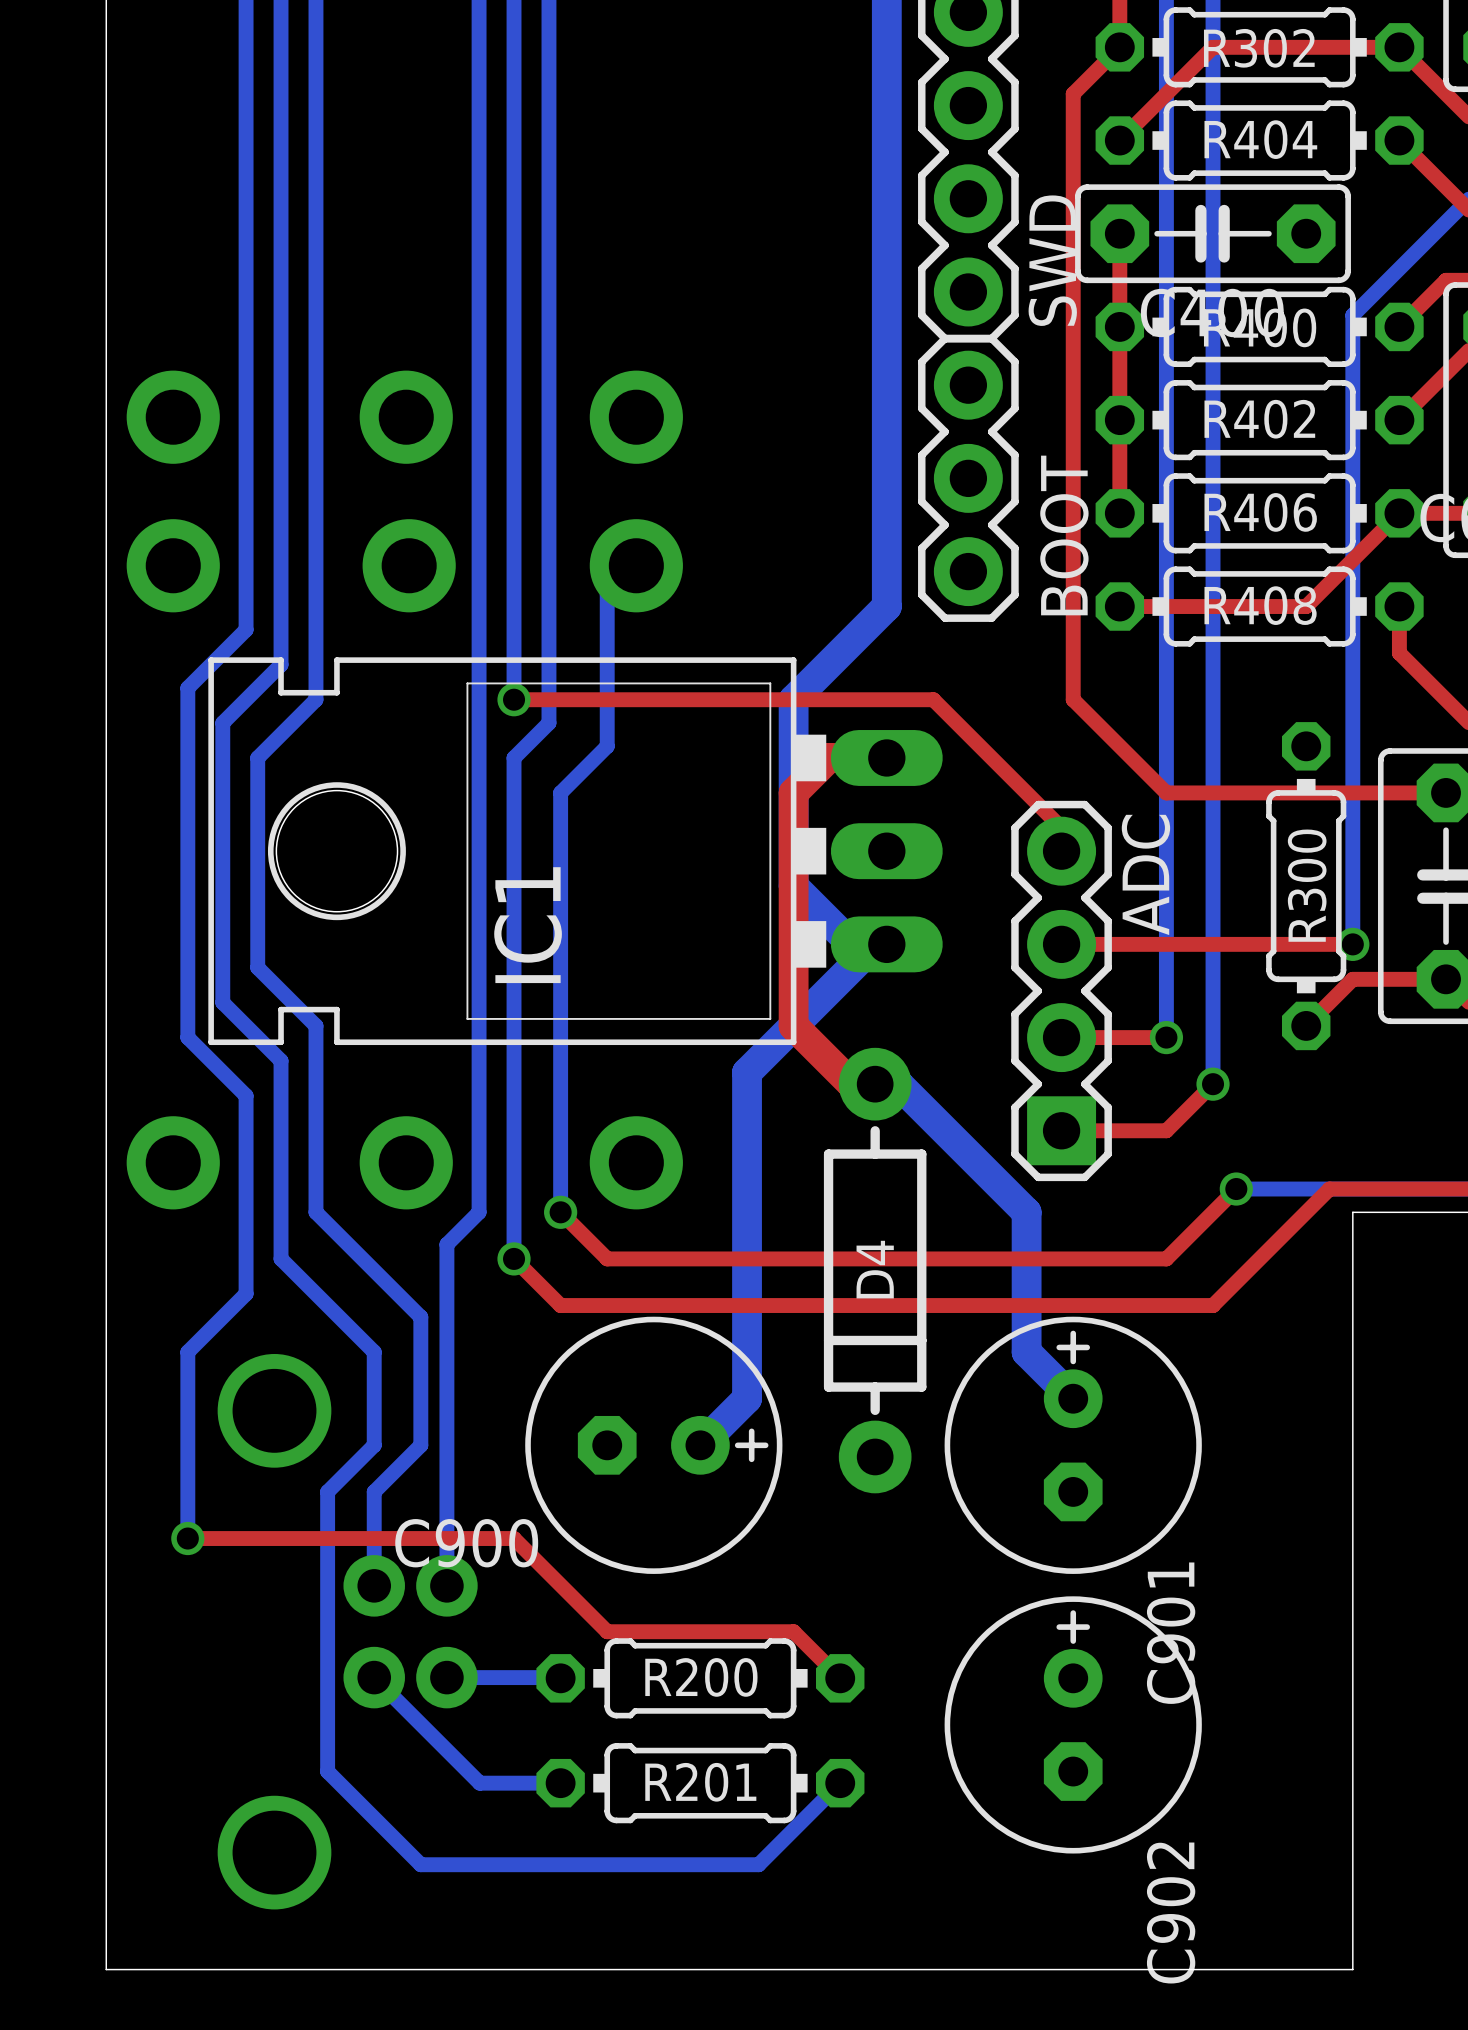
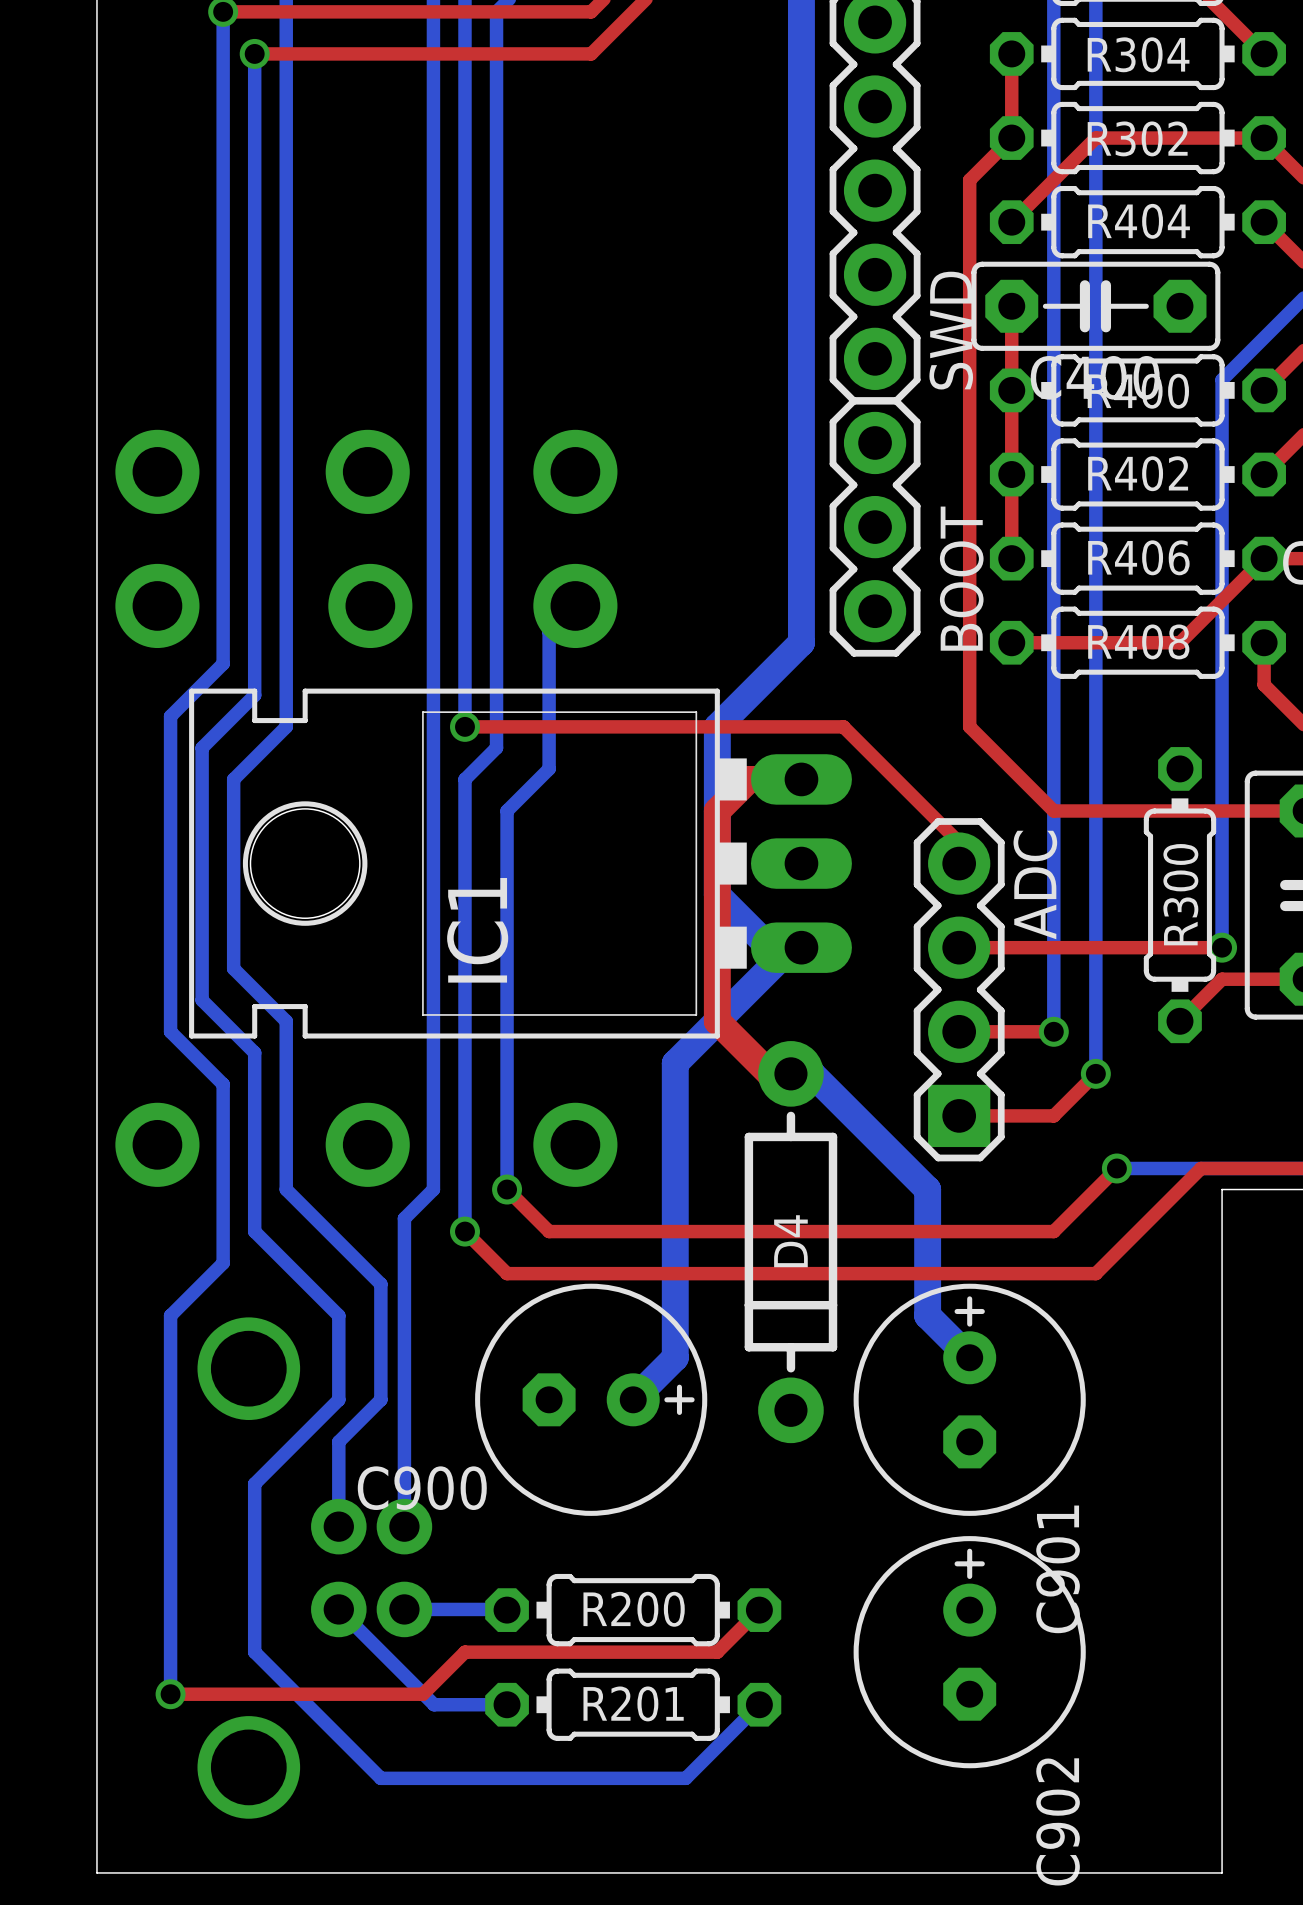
bottom track: (327, 1491) (327, 1771) -> (296, 1441) (254, 1483) (254, 1652) (296, 1694)
top track: (187, 1538) (514, 1538) (607, 1631) (793, 1631) (840, 1678) -> (170, 1694) (422, 1694) (464, 1652) (717, 1652) (759, 1610)
bottom track: none -> (170, 1483) (170, 1694)
via: (187, 1538) -> none
via: none -> (170, 1694)

